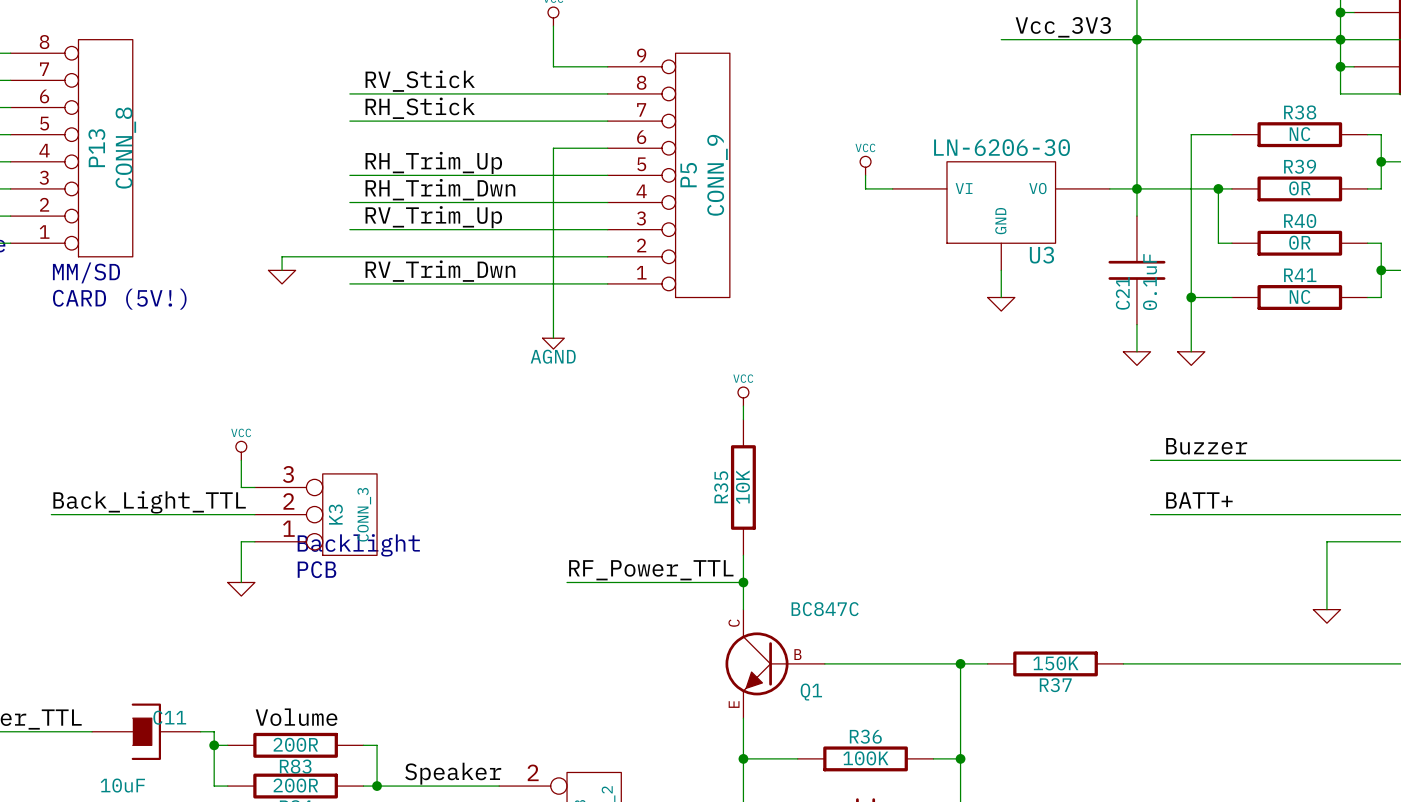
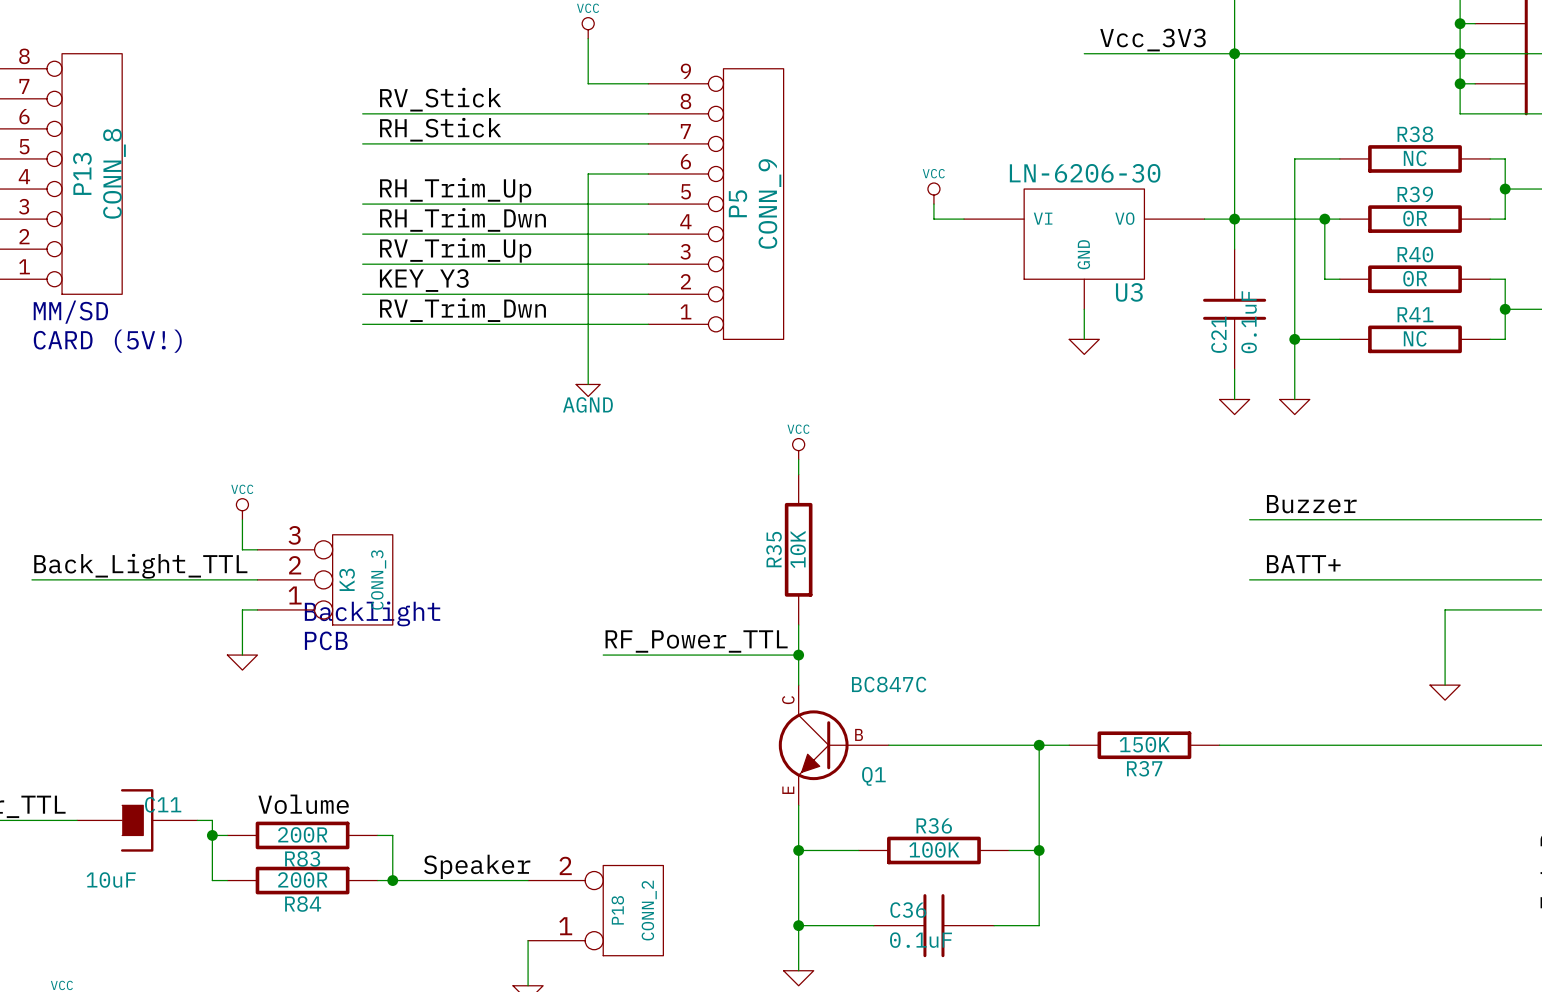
label: none -> KEY_Y3 (424, 280)
wire: (349, 256) (282, 256) (282, 270) -> none
power symbol: (282, 277) -> none

